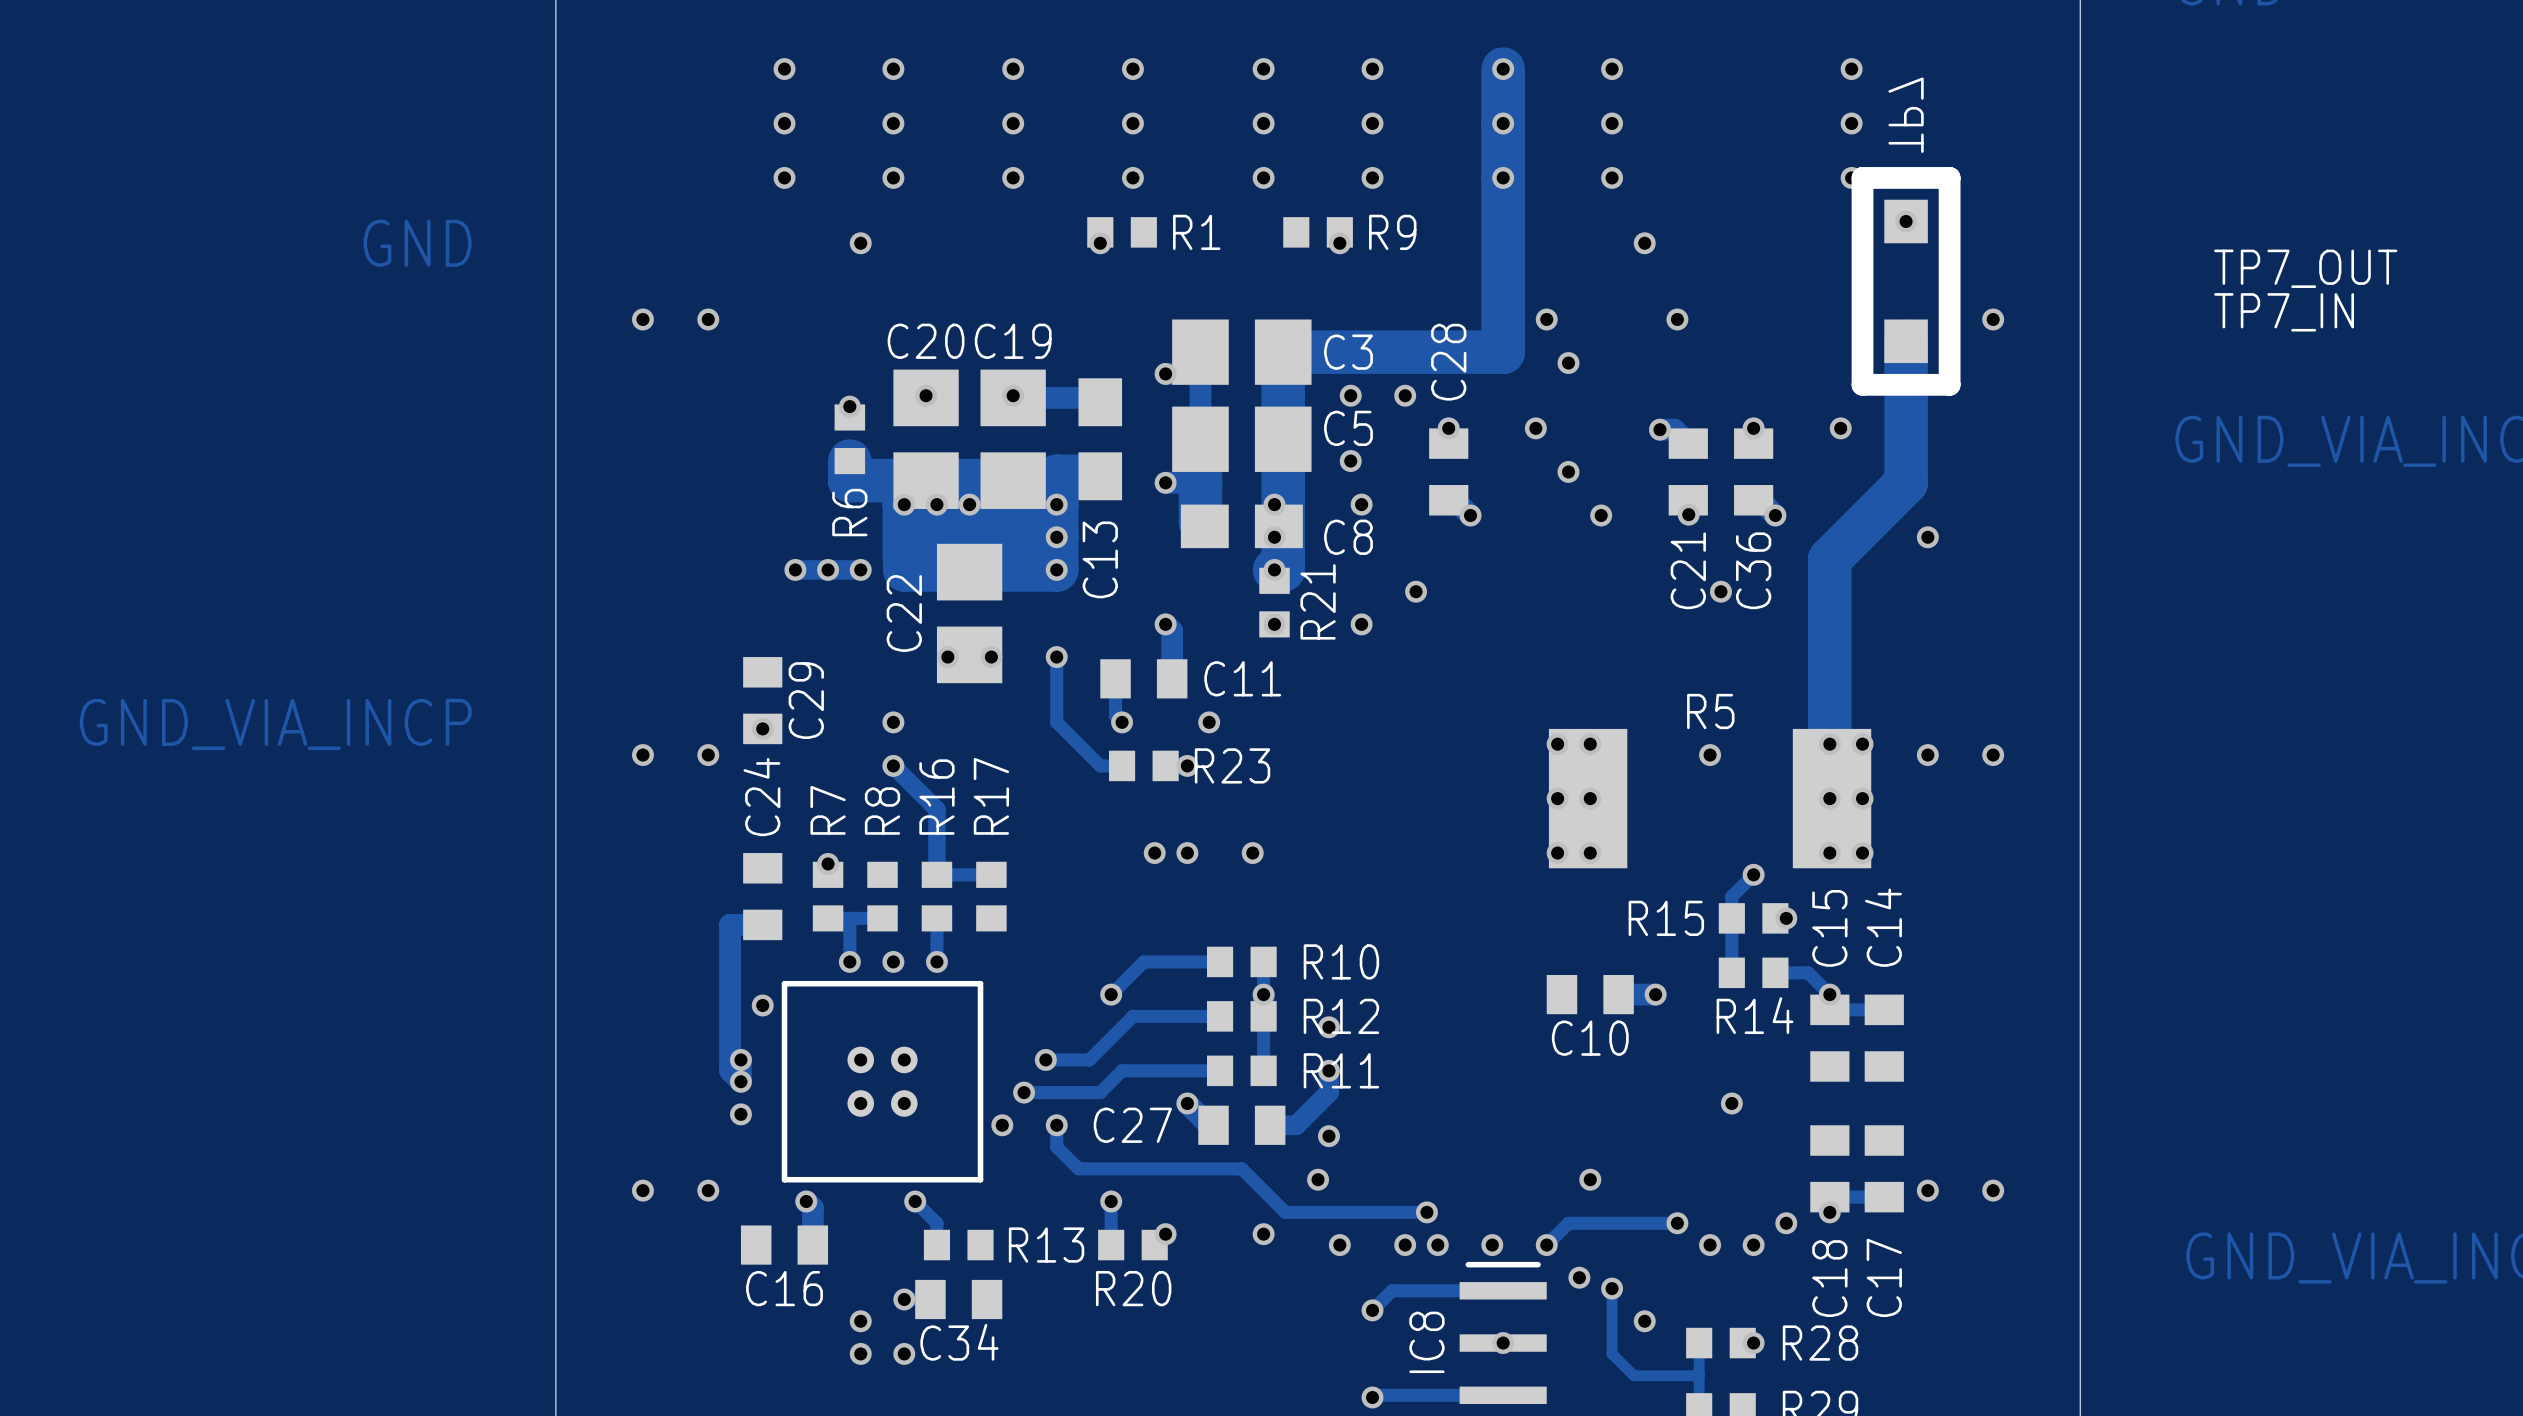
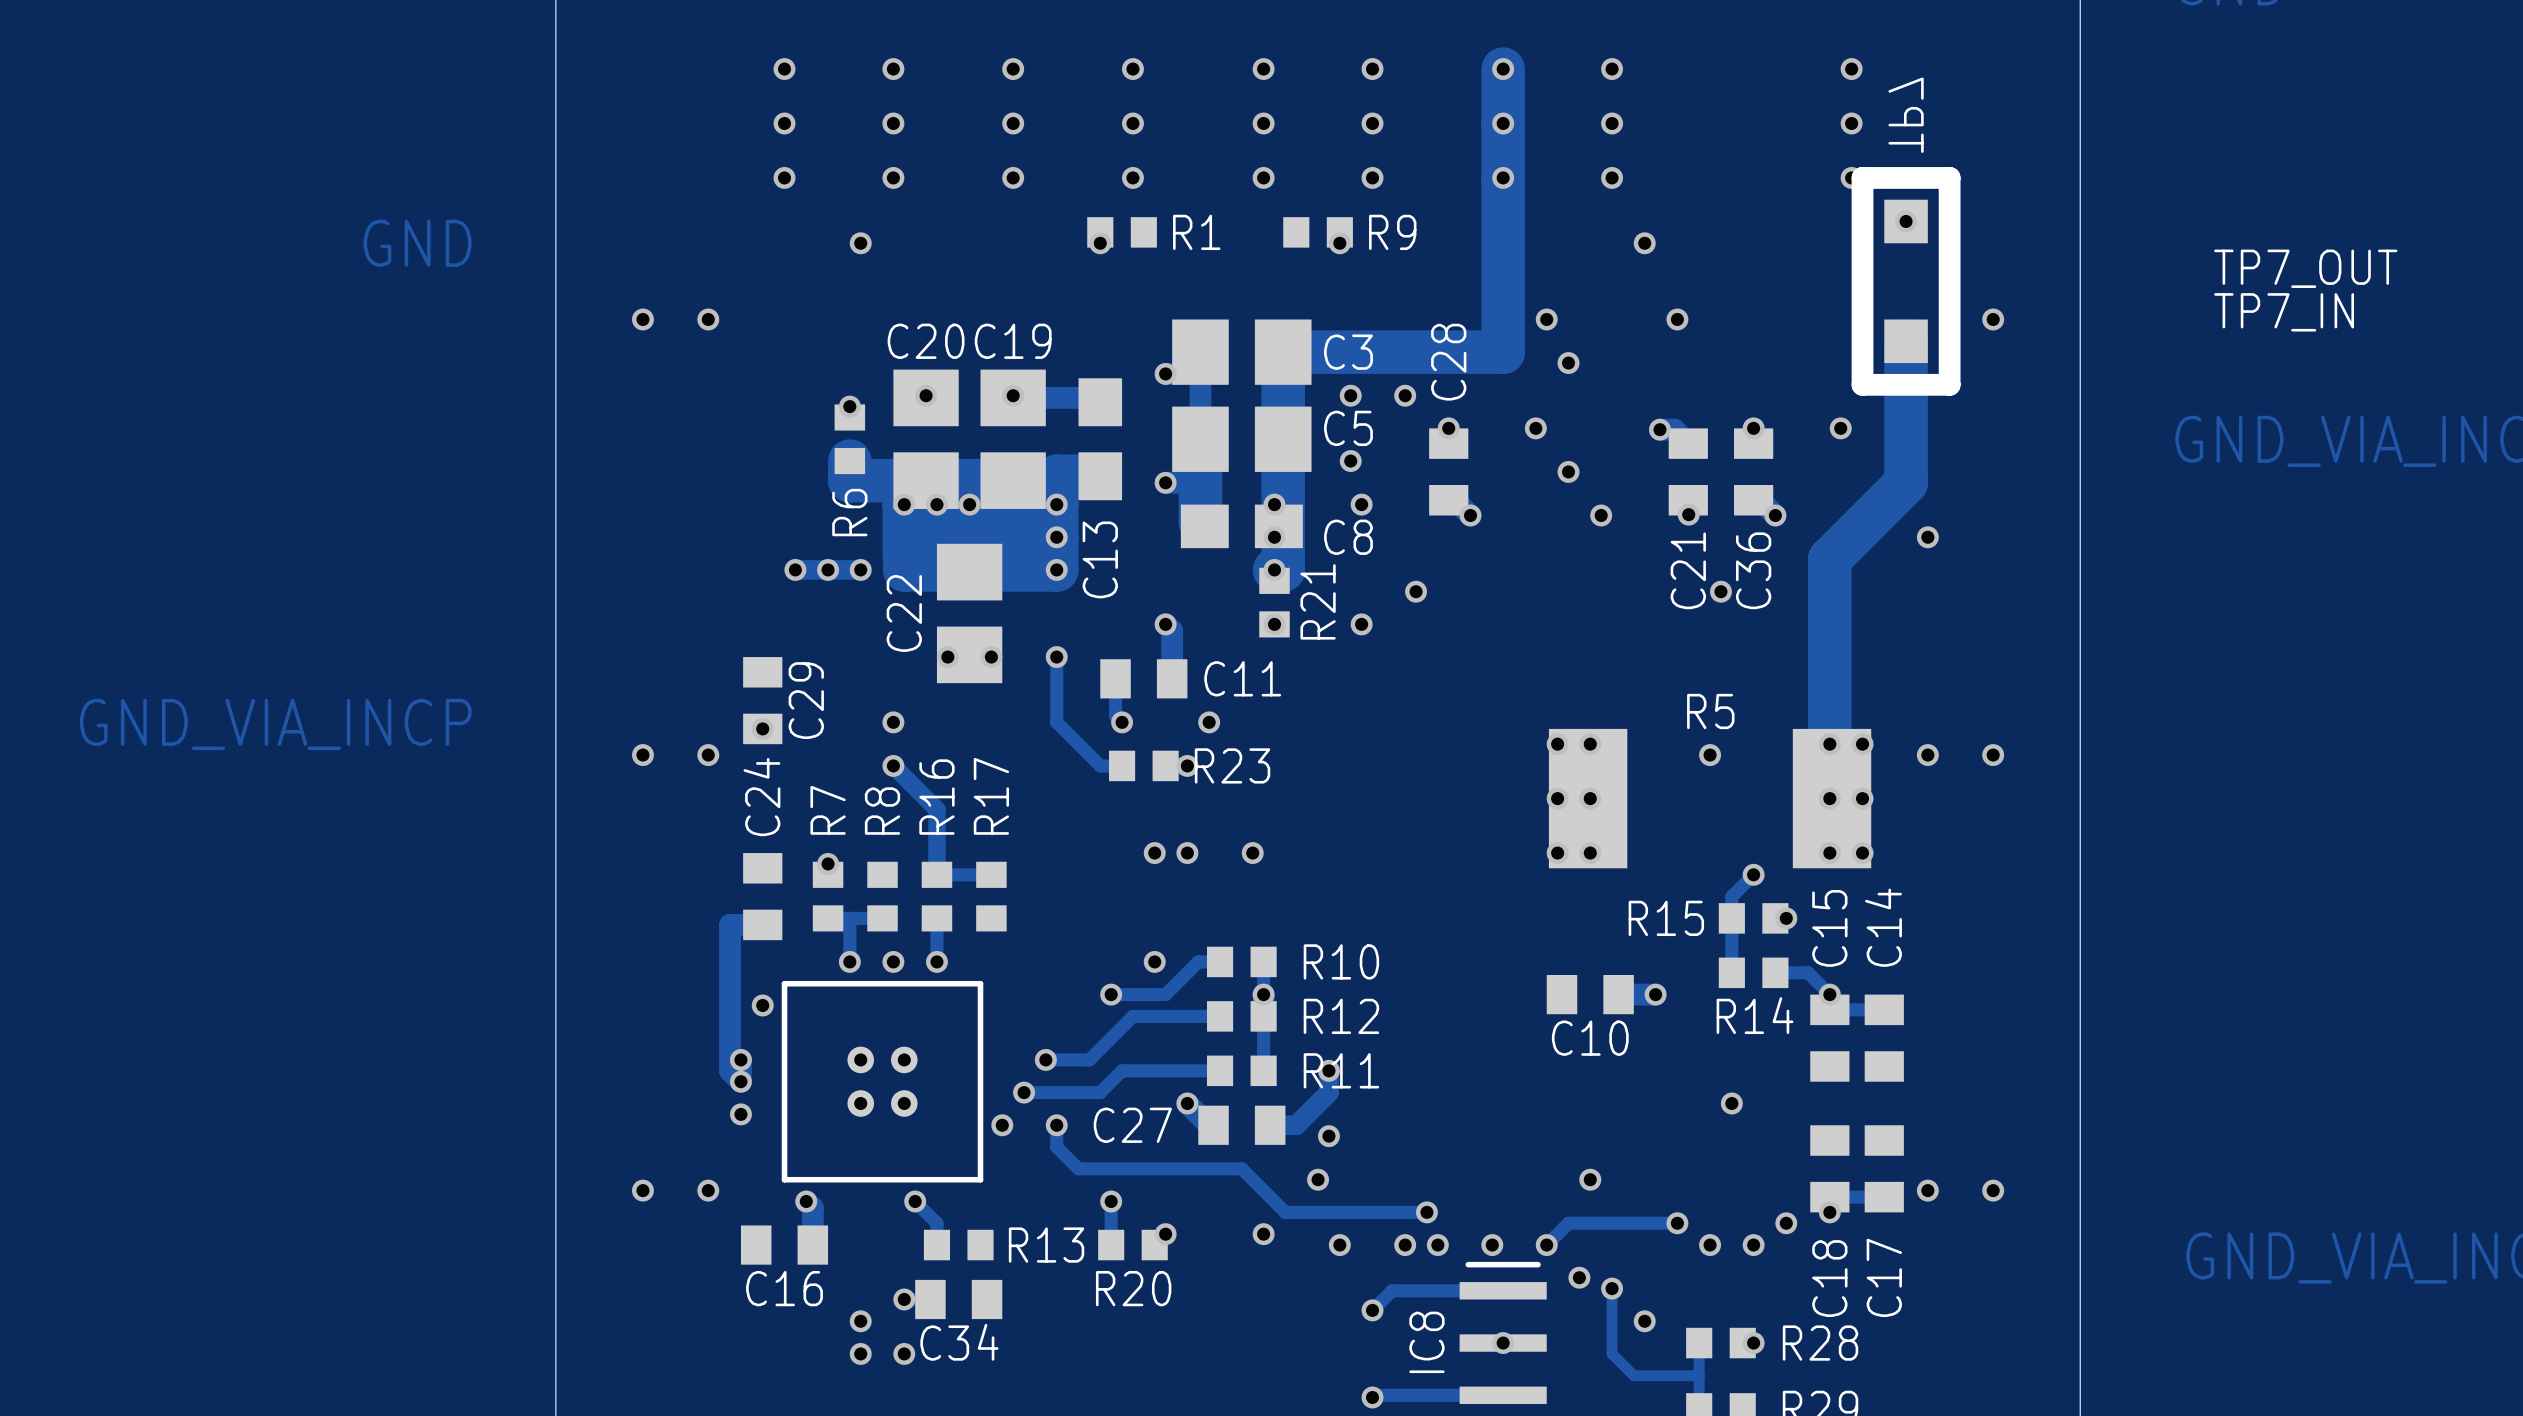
track: (1198, 961) (1143, 961) (1111, 994) -> (1198, 961) (1165, 994) (1111, 994)
via position: (1328, 1027) -> (1154, 961)

